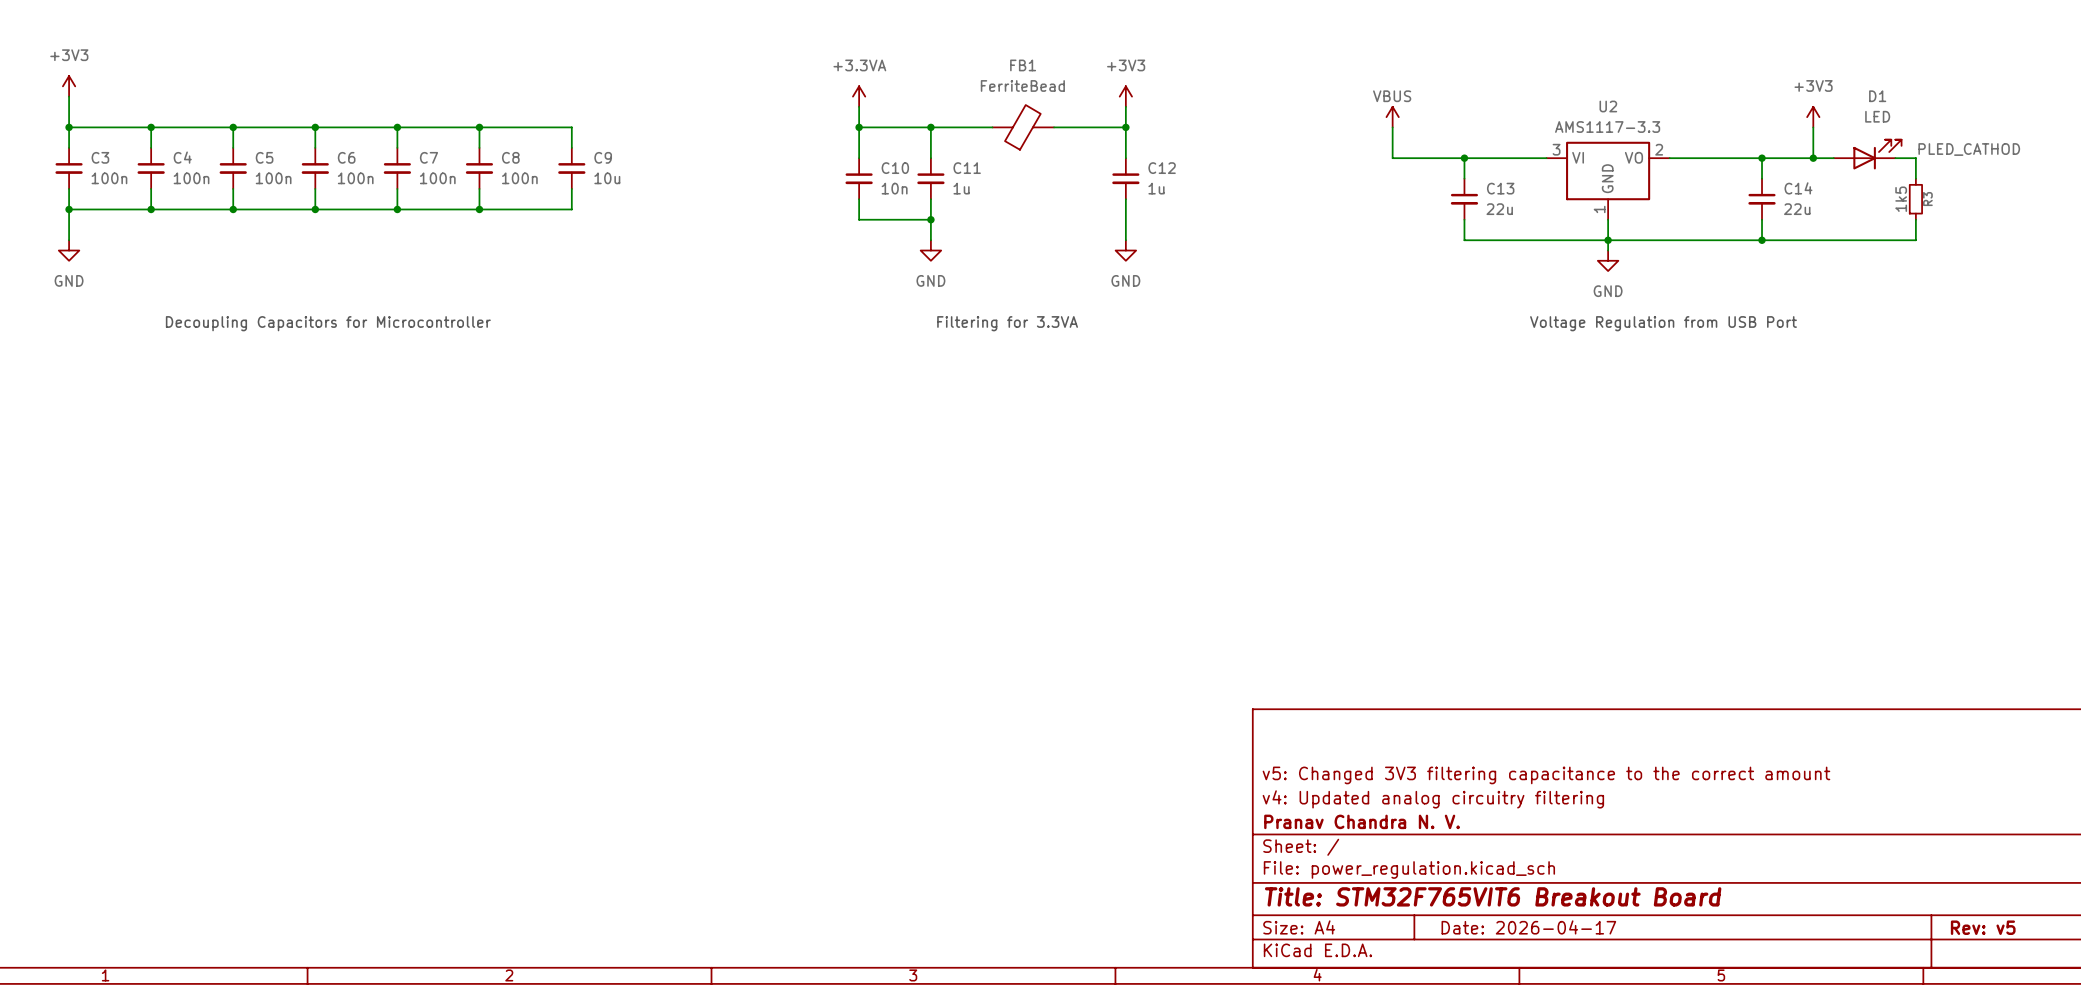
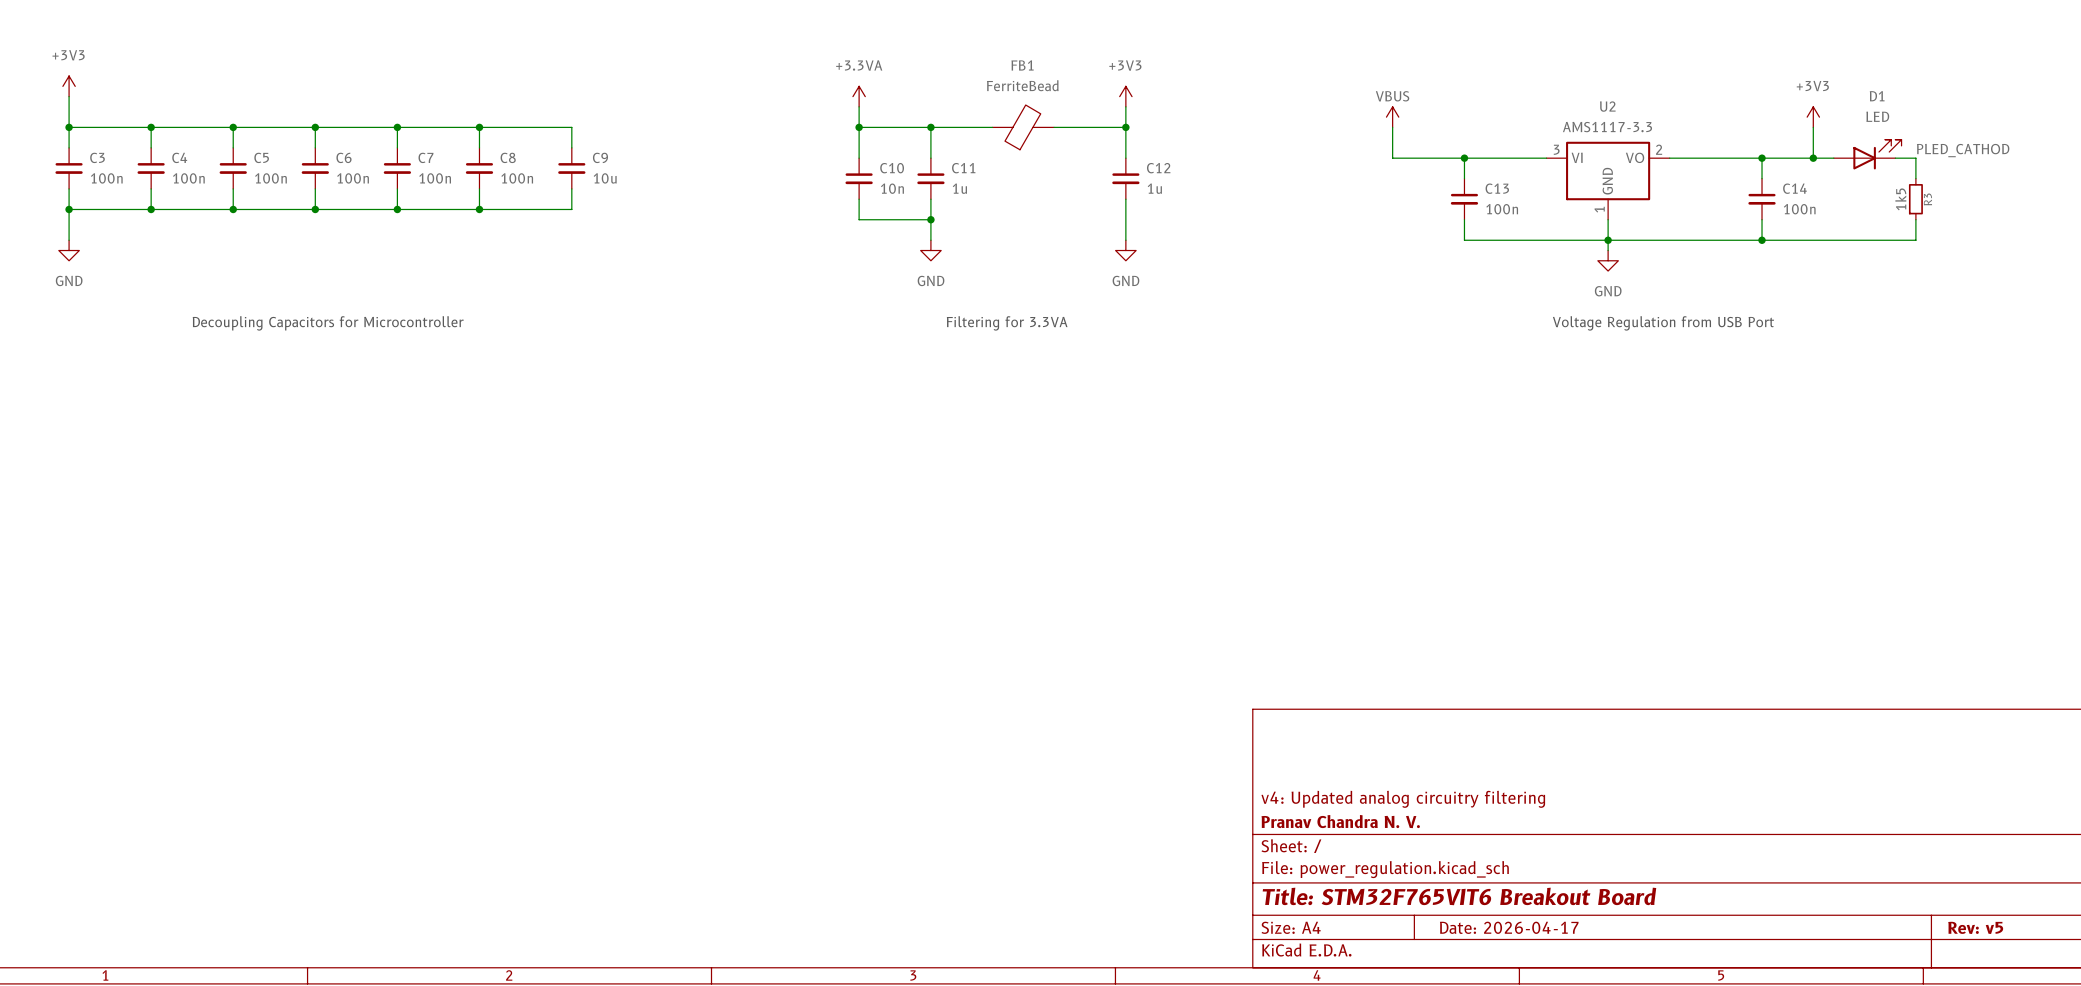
C13 value: 22u (1499, 209) -> 100n (1502, 209)
C14 value: 22u (1797, 209) -> 100n (1799, 209)
title block: v5: Changed 3V3 filtering capacitance to the correct amount (1546, 775) -> none

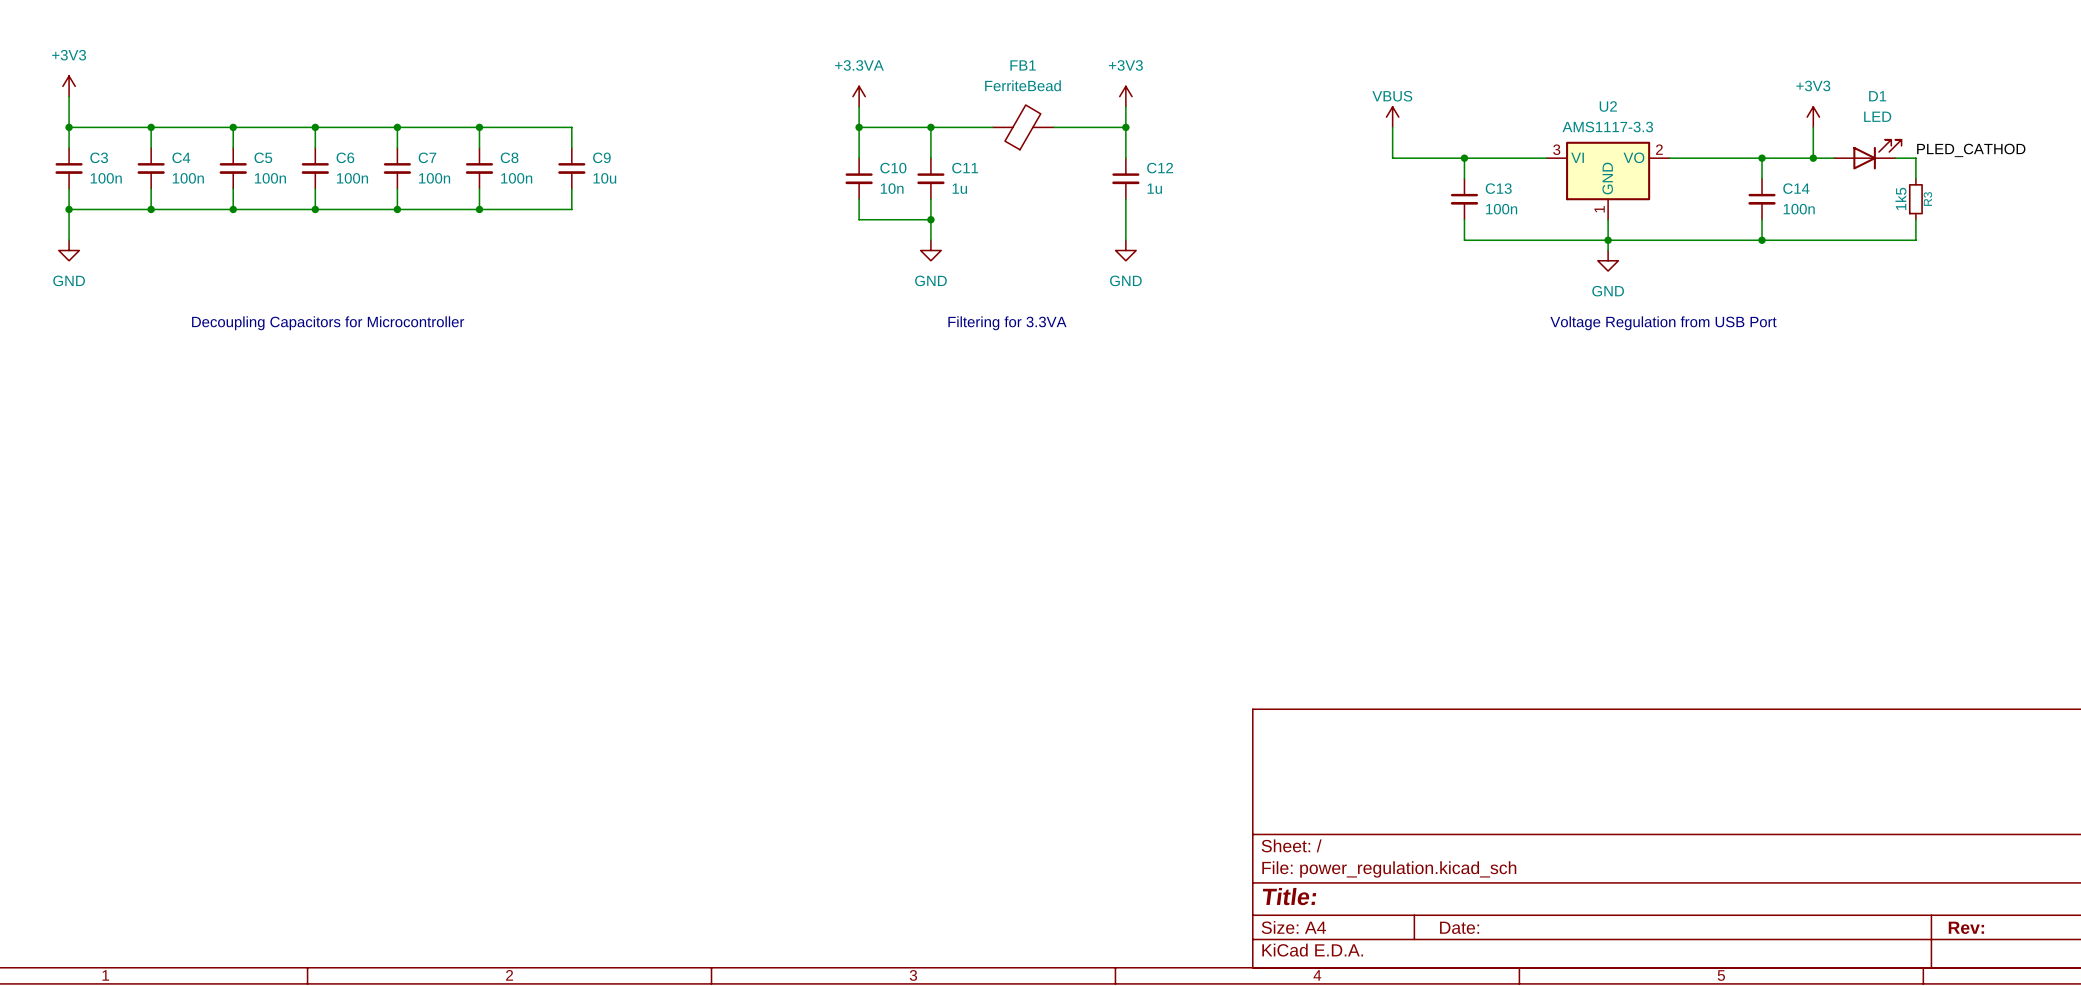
title block: v4: Updated analog circuitry filtering (1403, 799) -> none
title block: Pranav Chandra N. V. (1340, 821) -> none
title block: Title: STM32F765VIT6 Breakout Board (1459, 896) -> Title: (1289, 896)
title block: Date: 2026-04-17 (1509, 927) -> Date: (1459, 927)
title block: Rev: v5 (1975, 927) -> Rev: (1966, 927)

